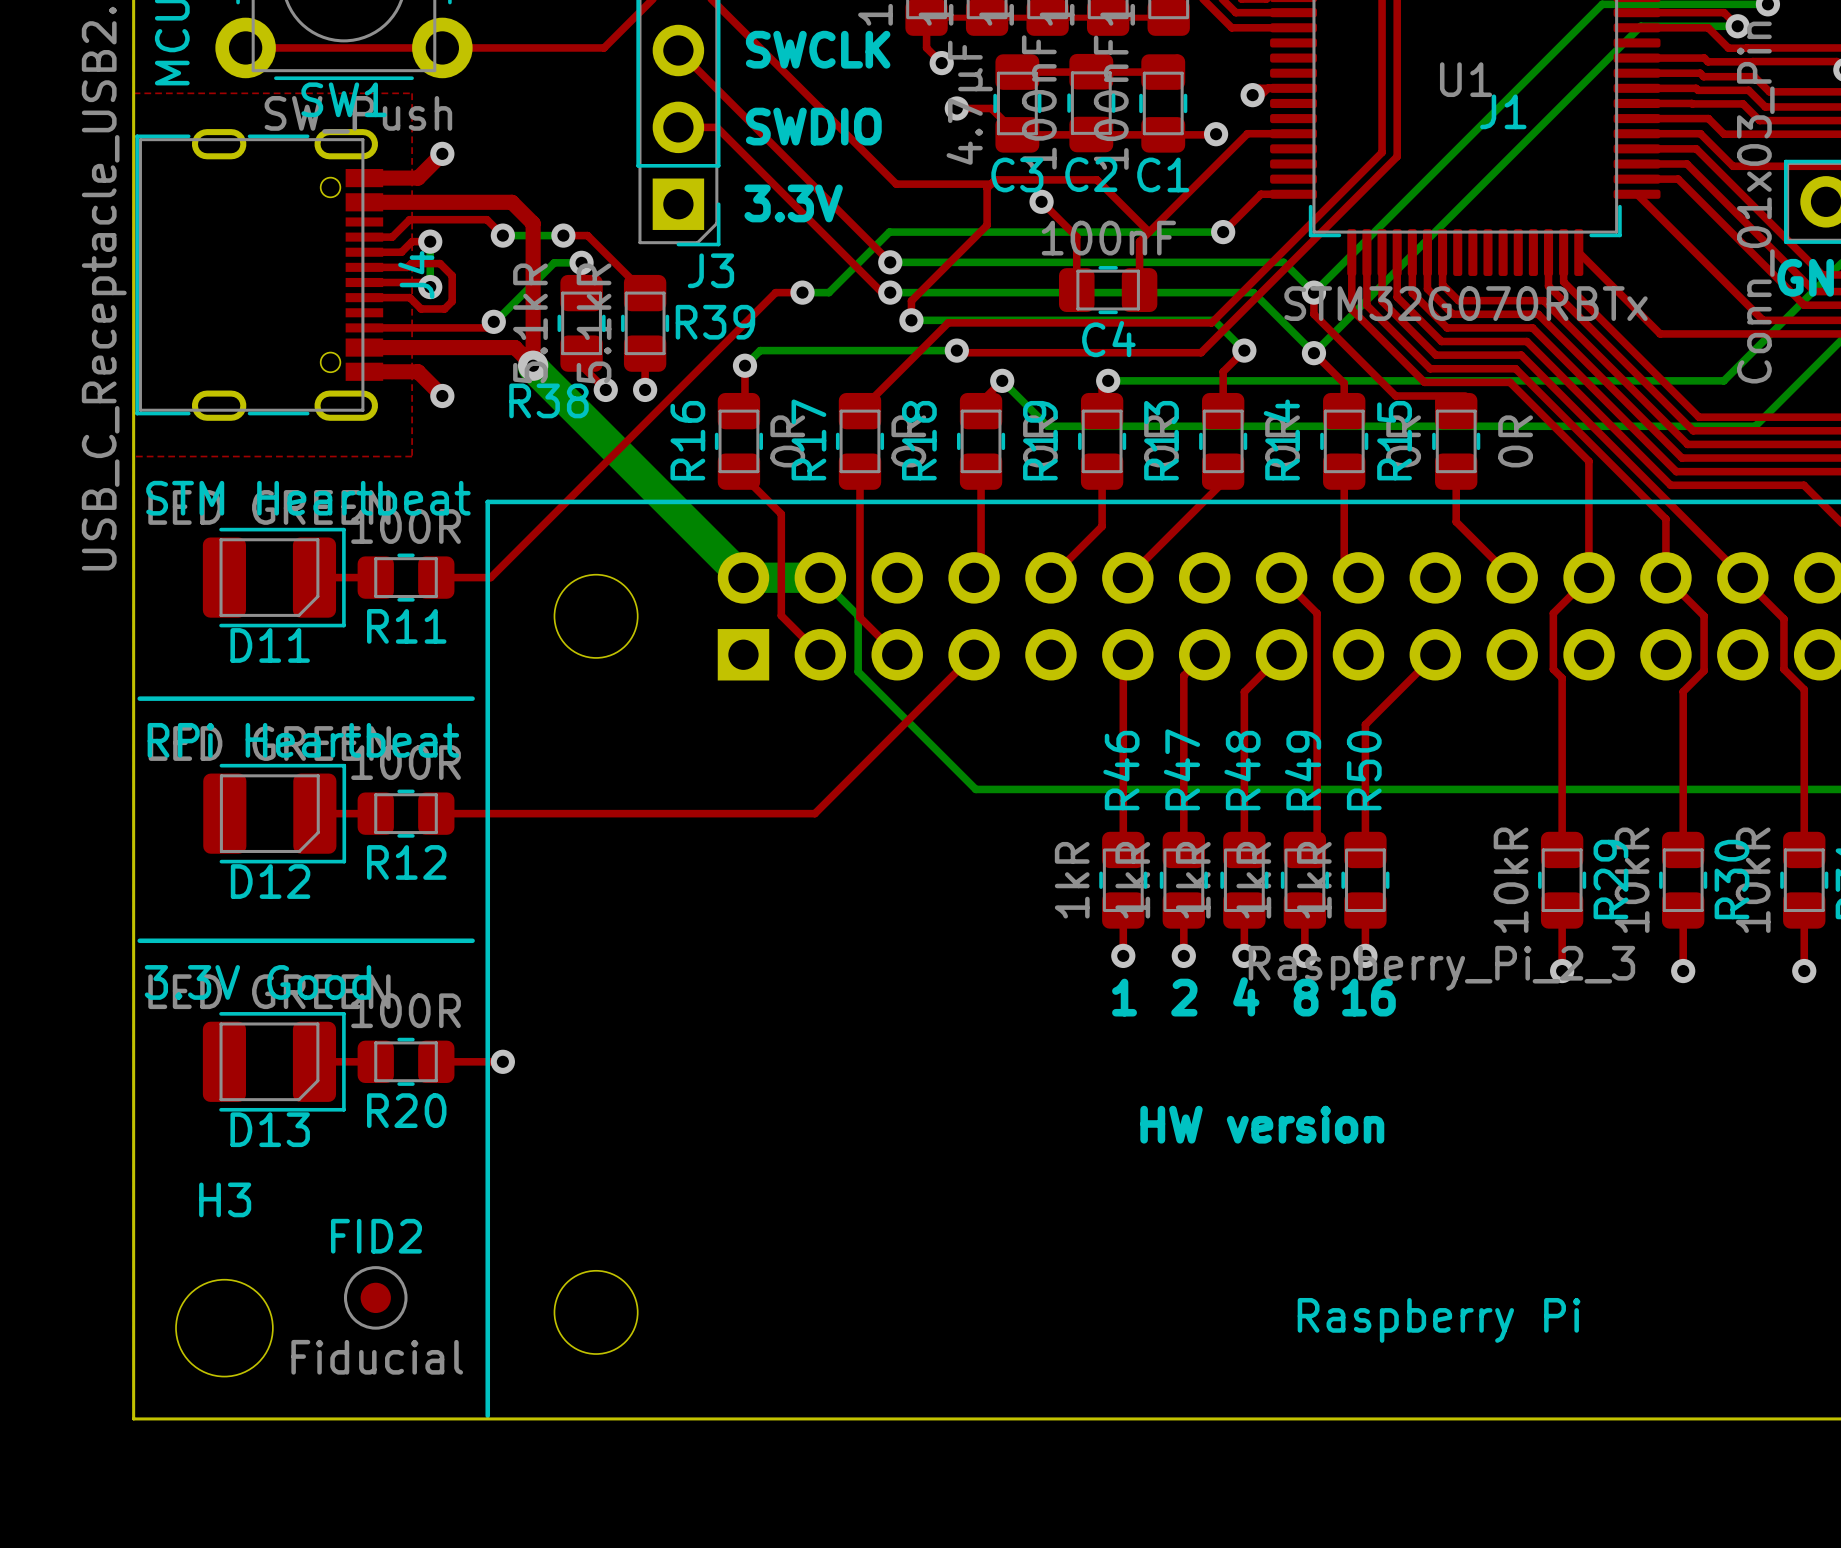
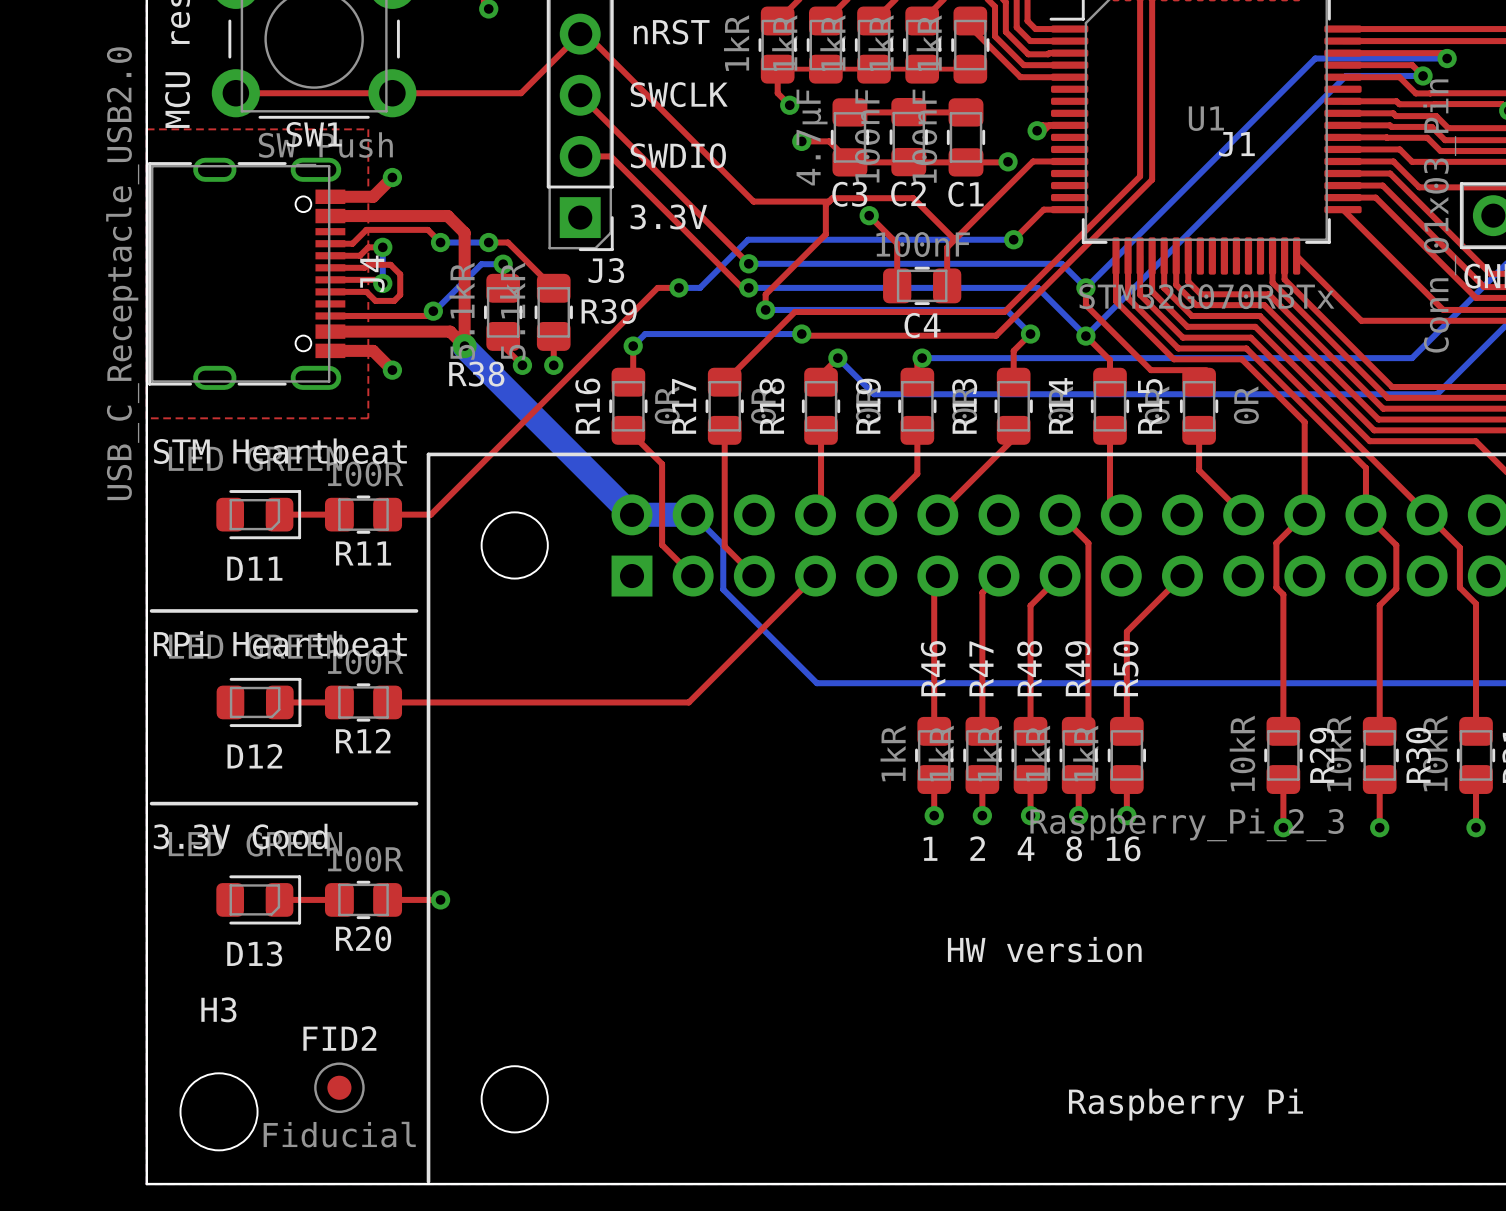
D11 footprint: [202, 527, 346, 628] -> [216, 490, 302, 540]
D12 footprint: [203, 763, 347, 864] -> [216, 677, 302, 728]
D13 footprint: [202, 1012, 346, 1112] -> [216, 875, 302, 925]

